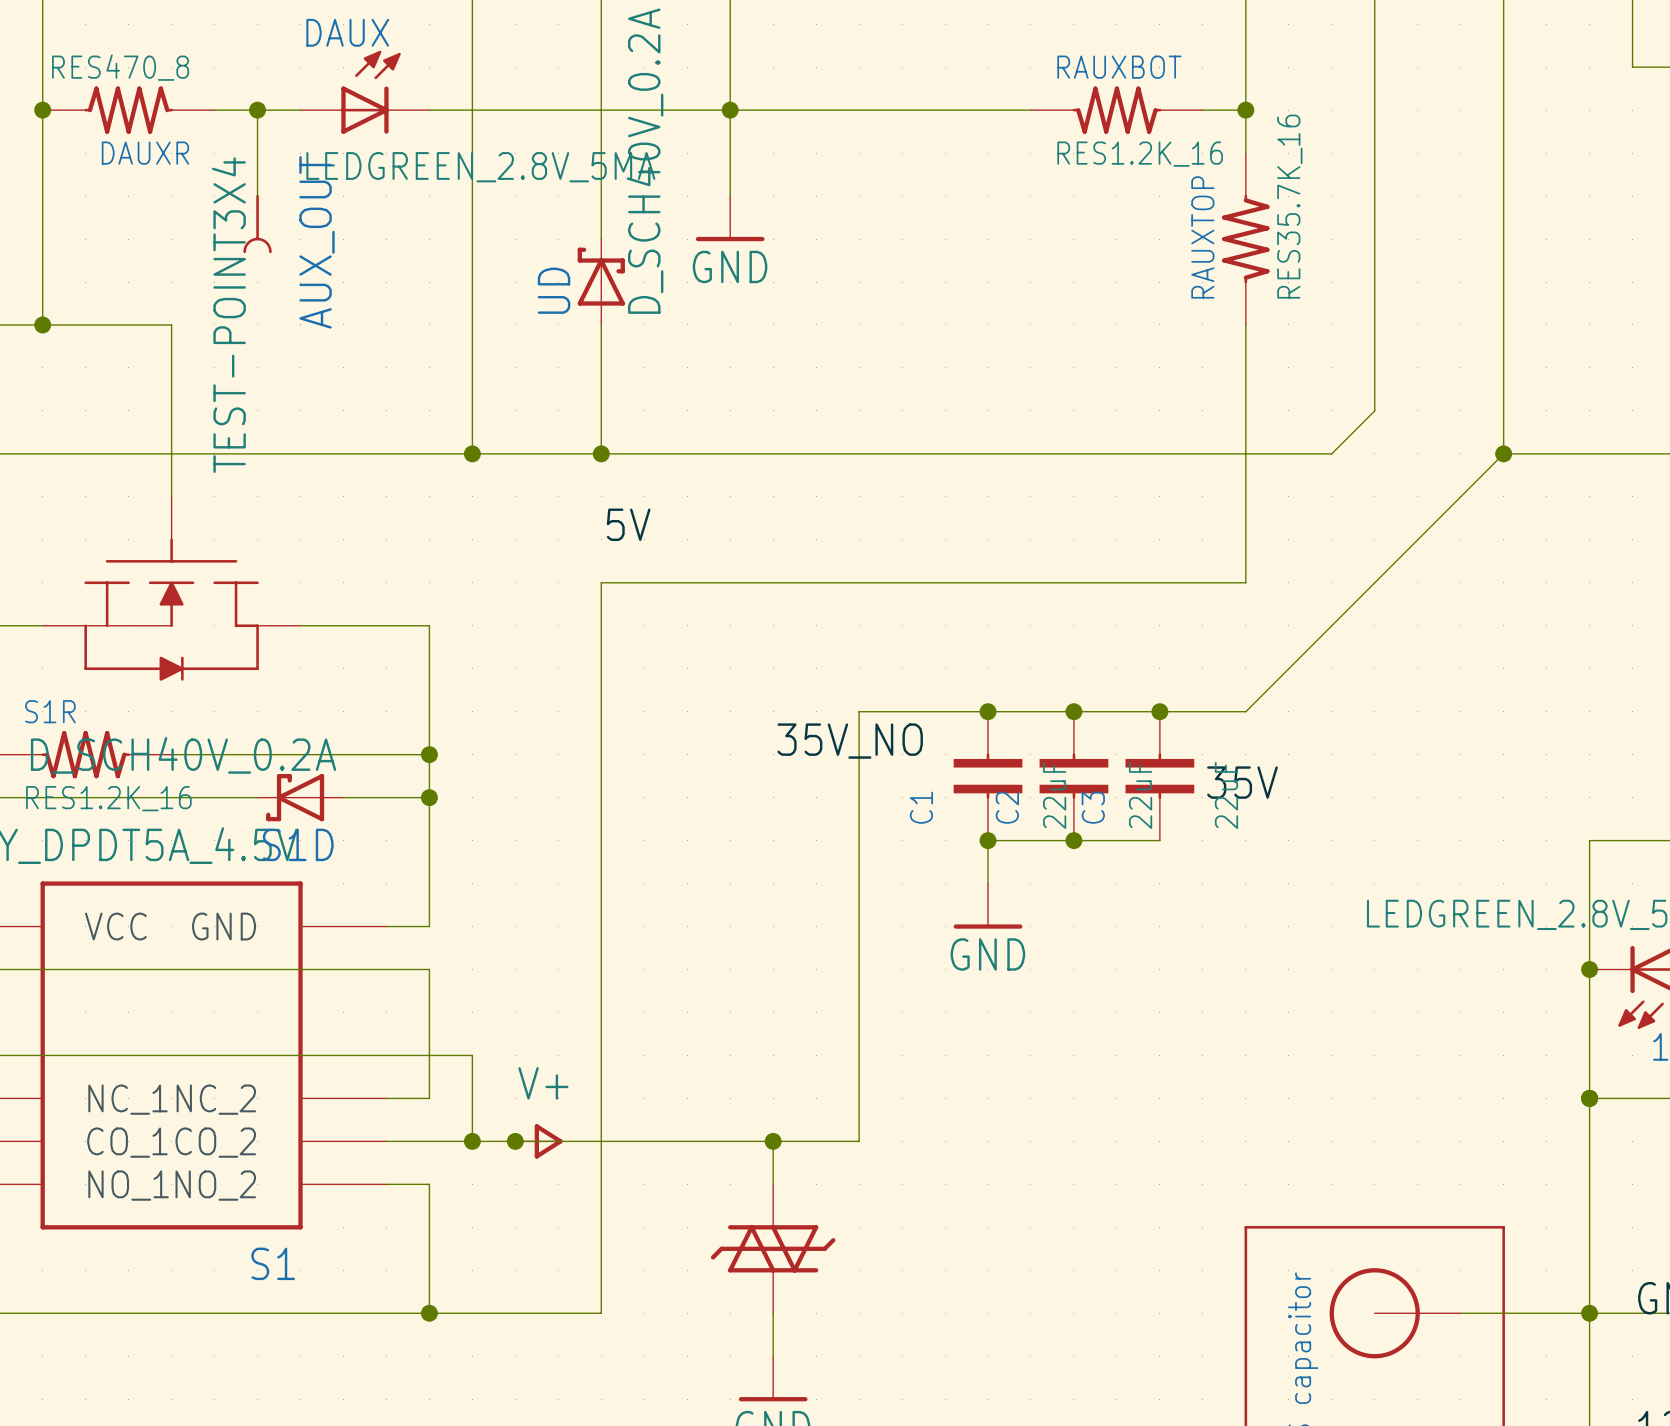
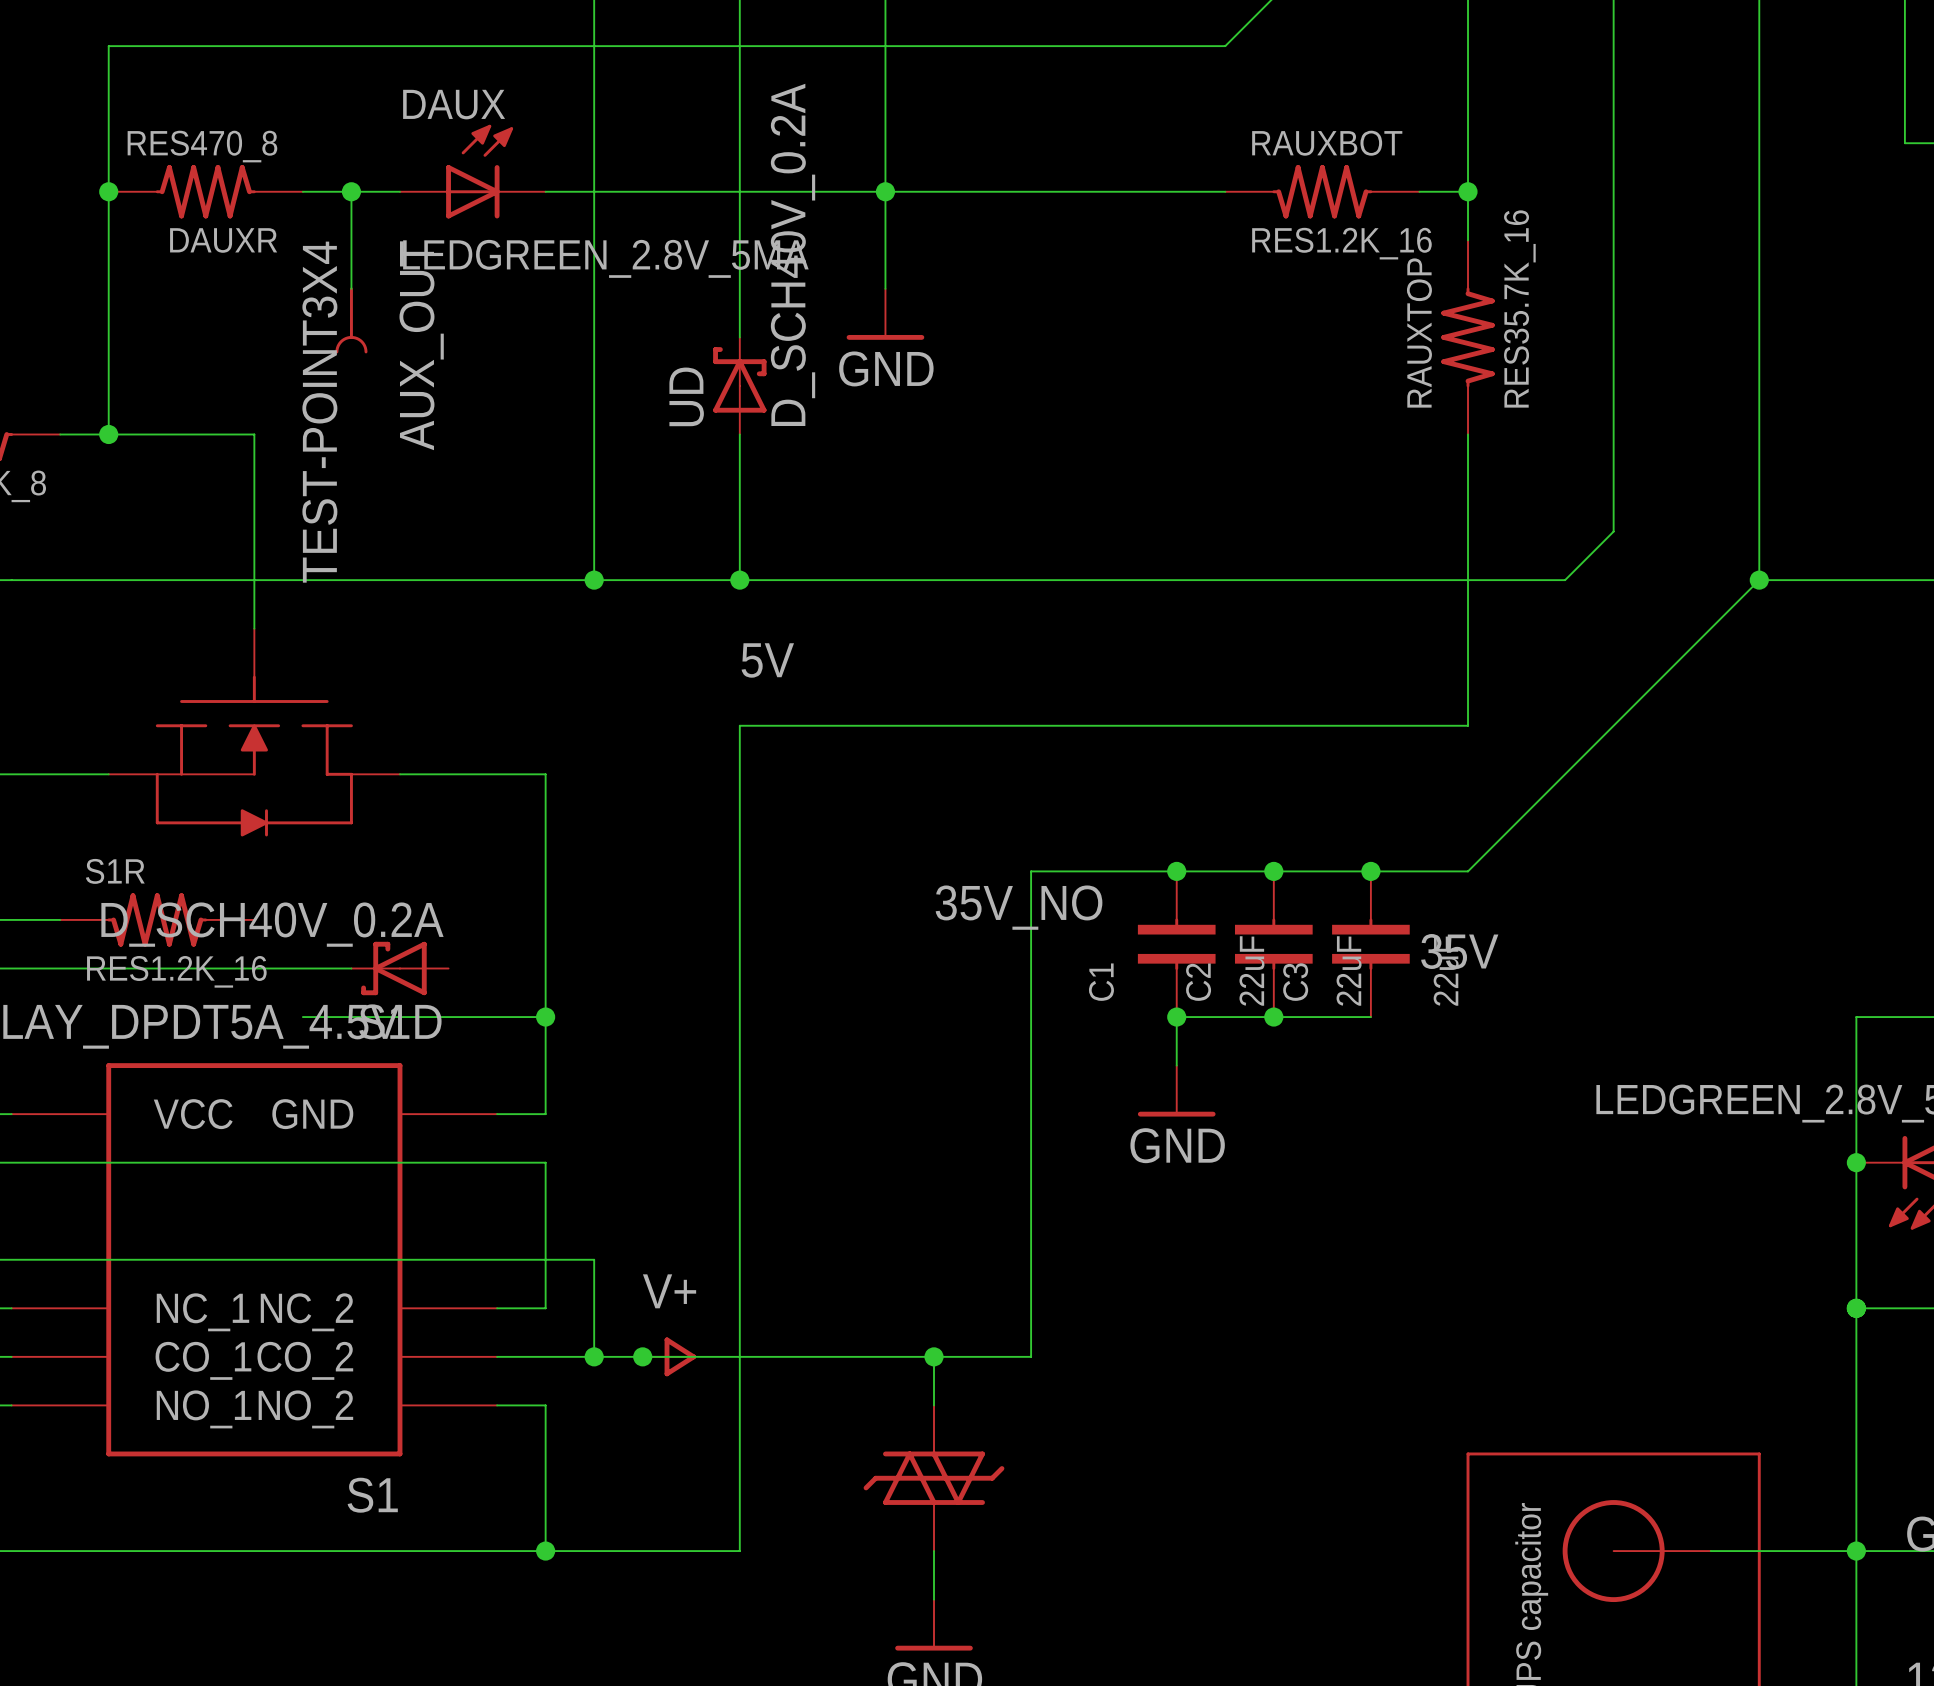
wire: (171, 754) (429, 754) -> none
junction: (429, 754) -> none
wire: (343, 797) (429, 797) -> none
junction: (429, 797) -> none
wire: none -> (302, 1017) (545, 1017)
junction: none -> (545, 1017)

